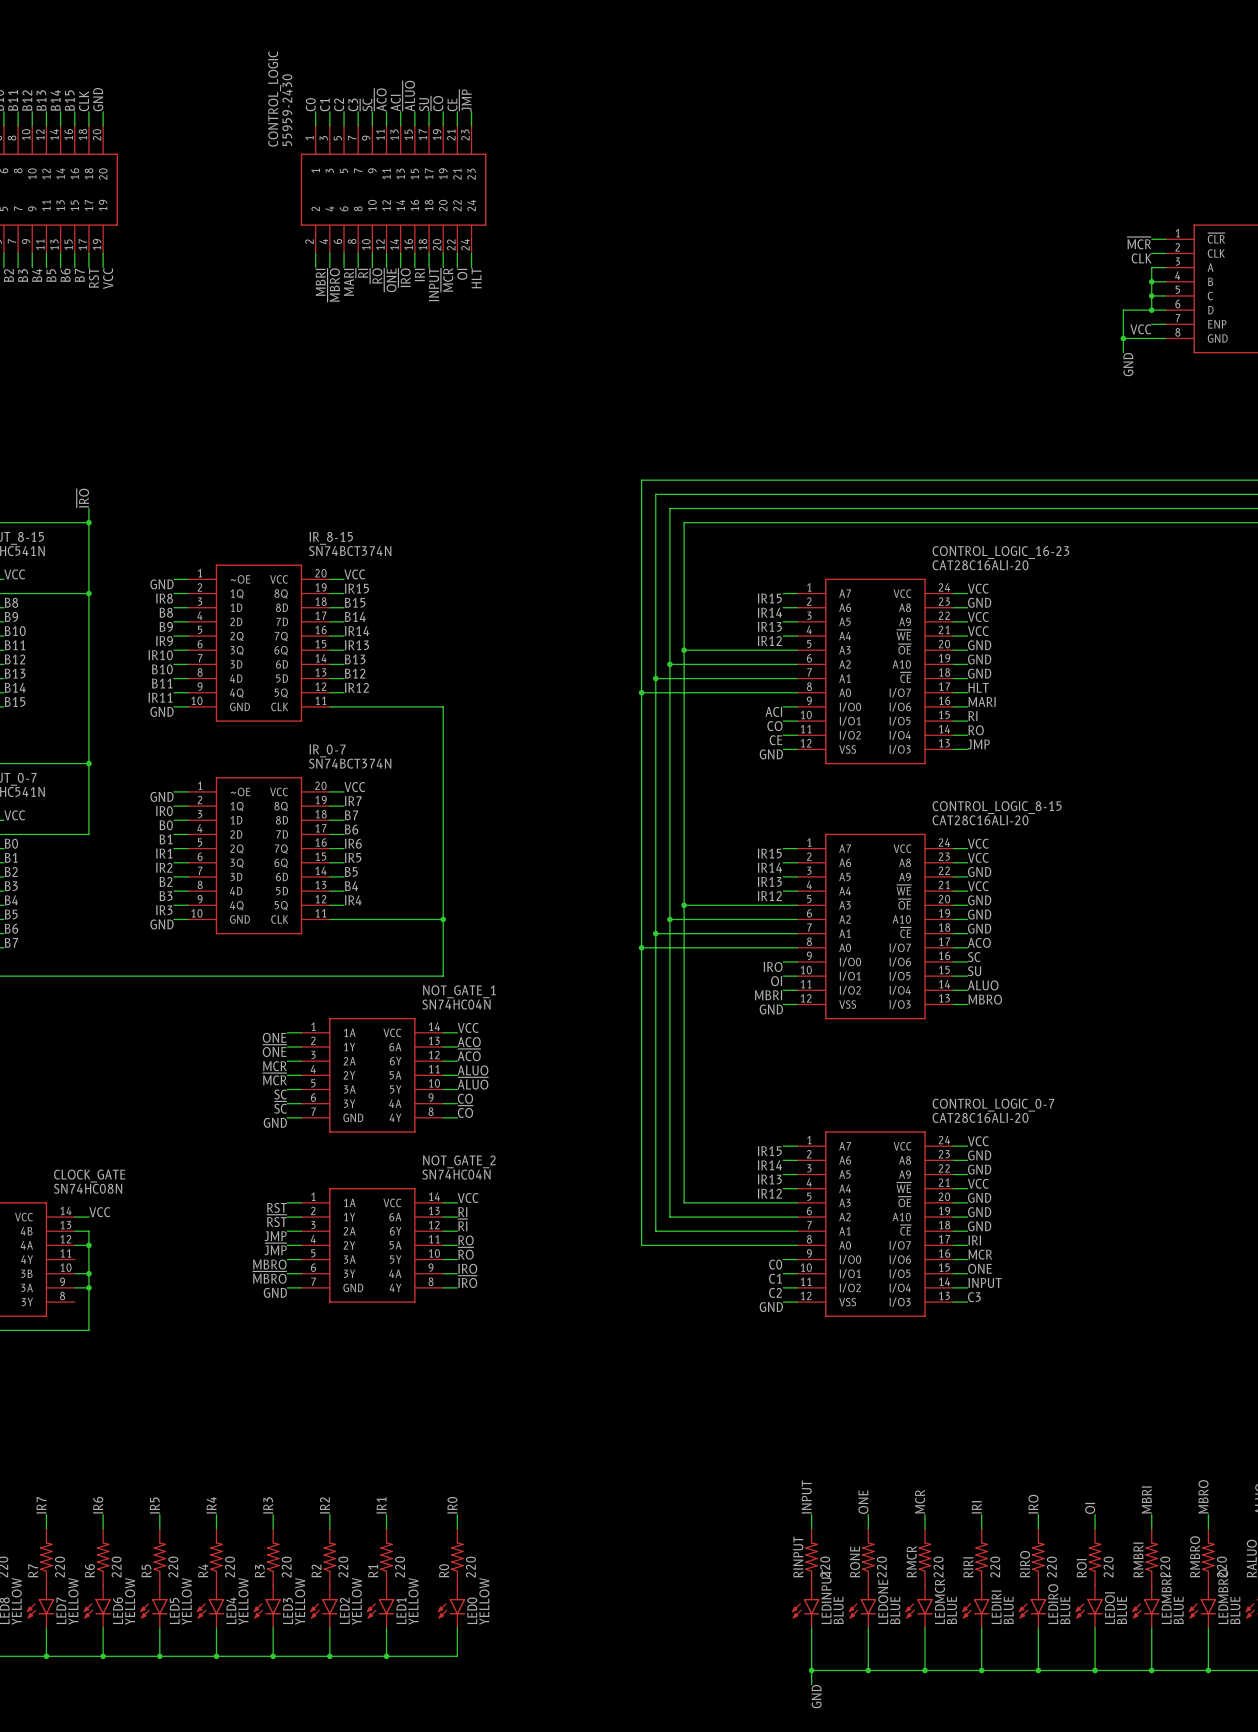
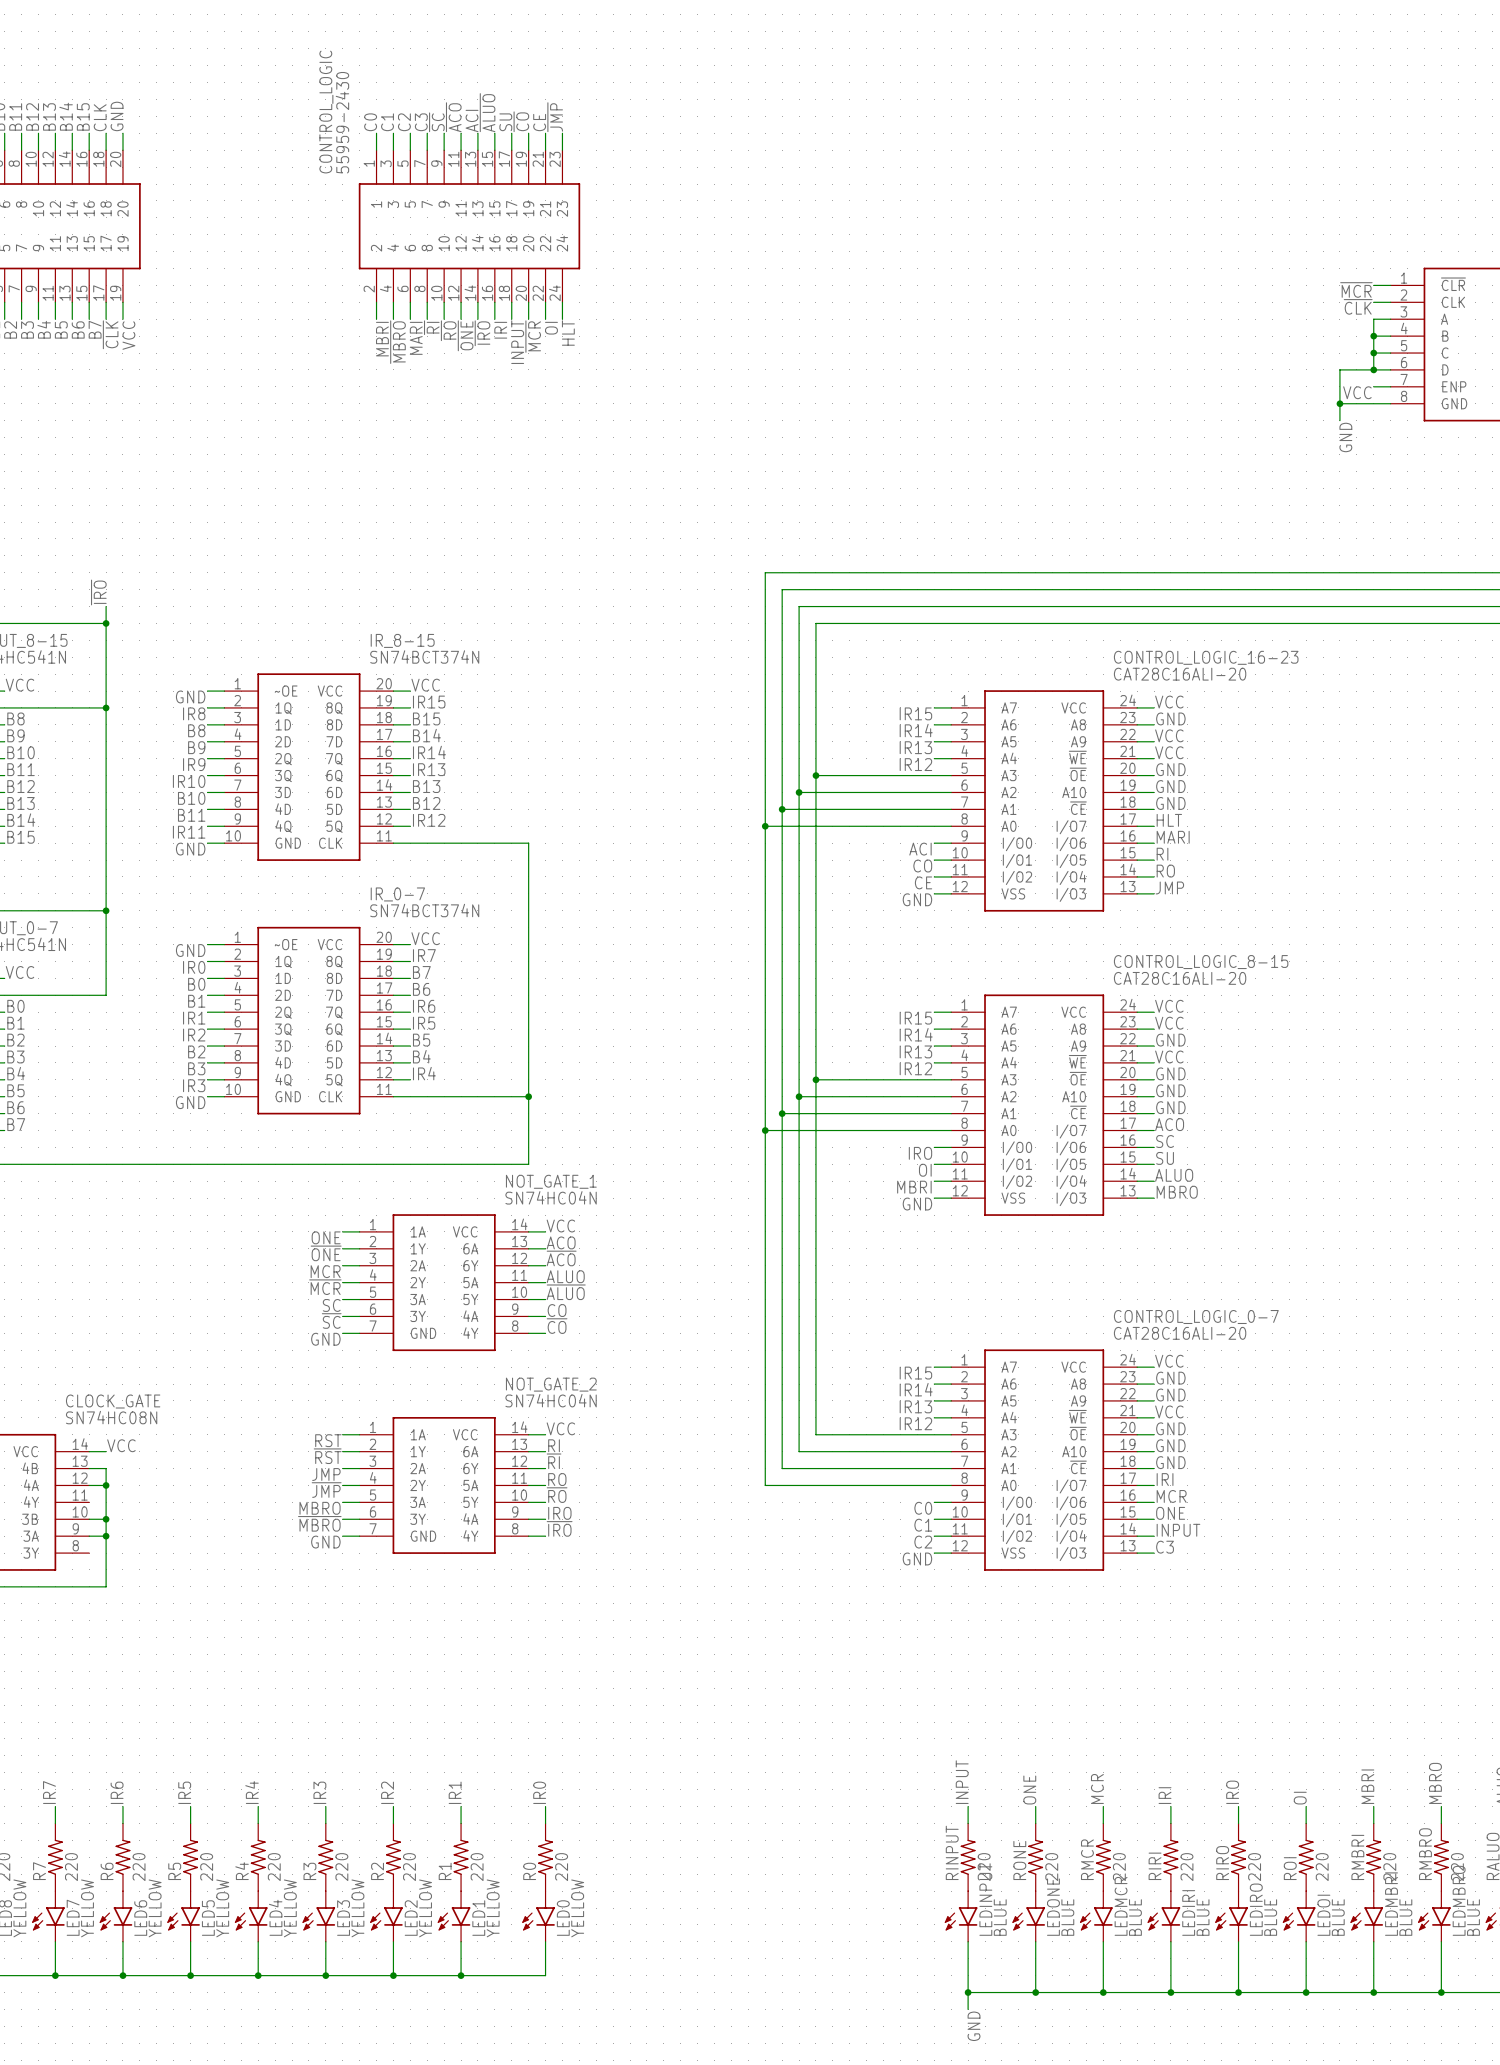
label: CLK (1141, 258) -> ~{CLK} (1358, 306)
label: RST (93, 277) -> ~{CLK} (110, 334)

